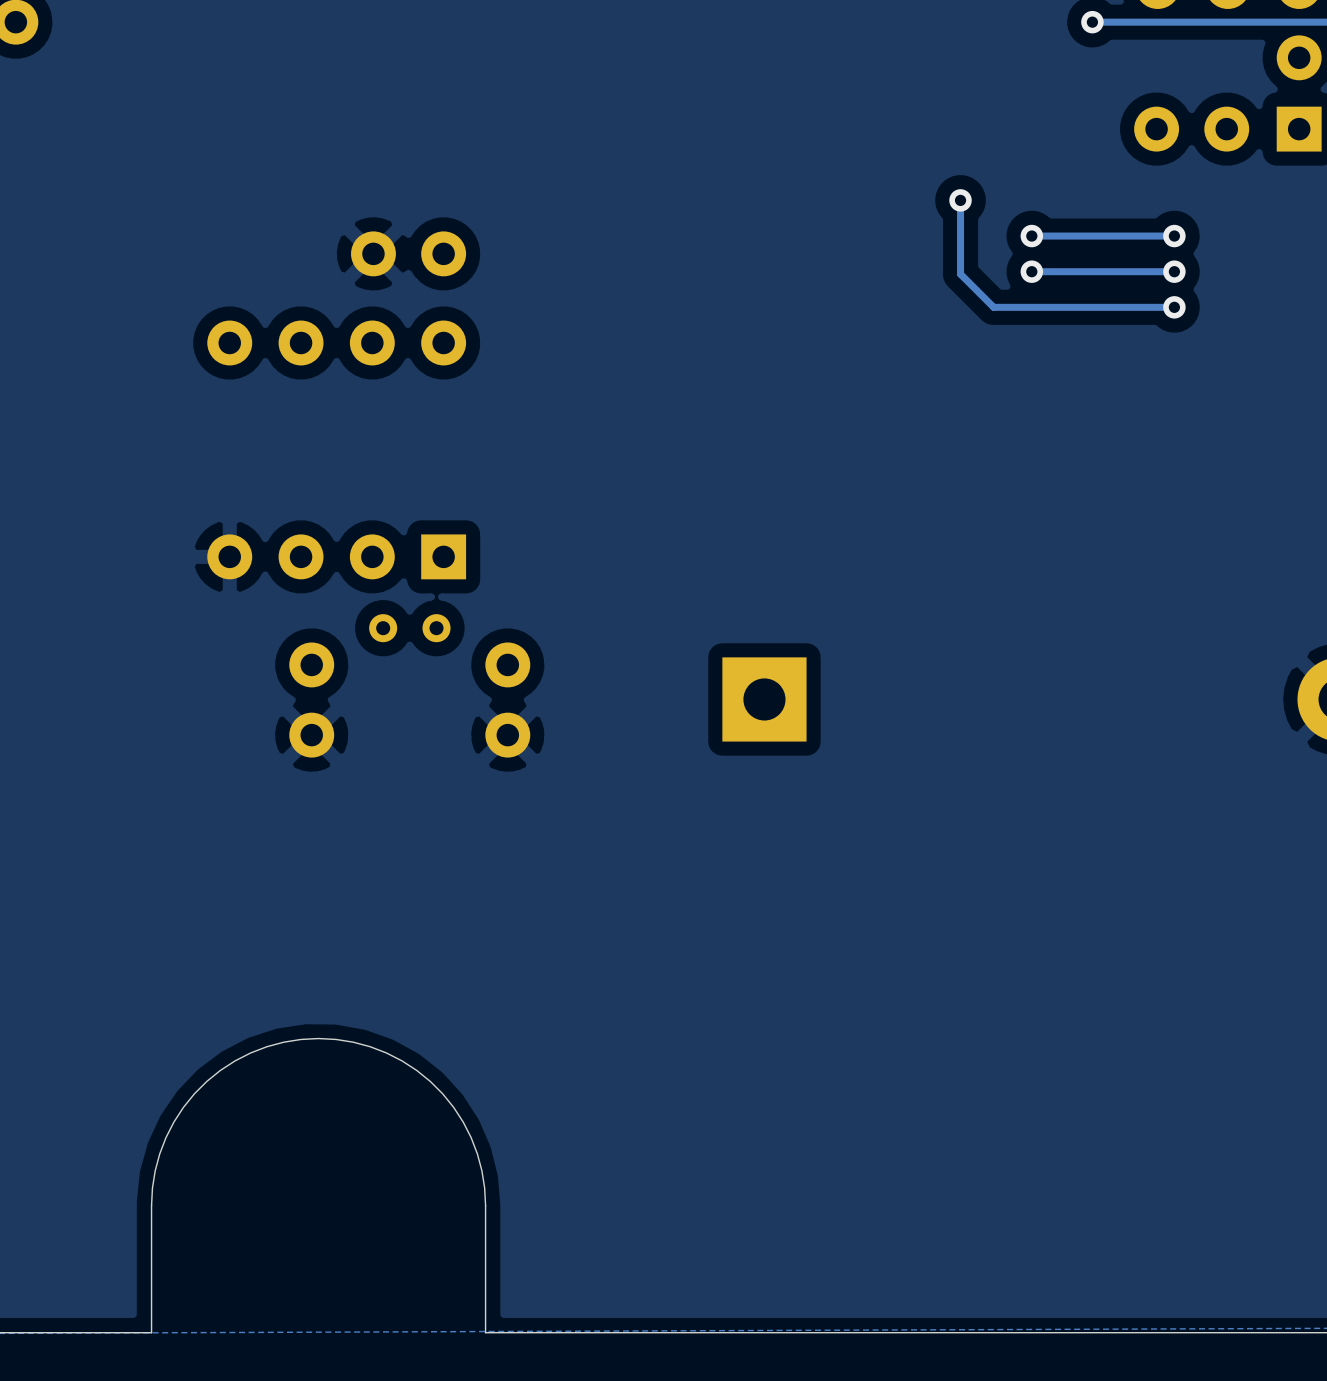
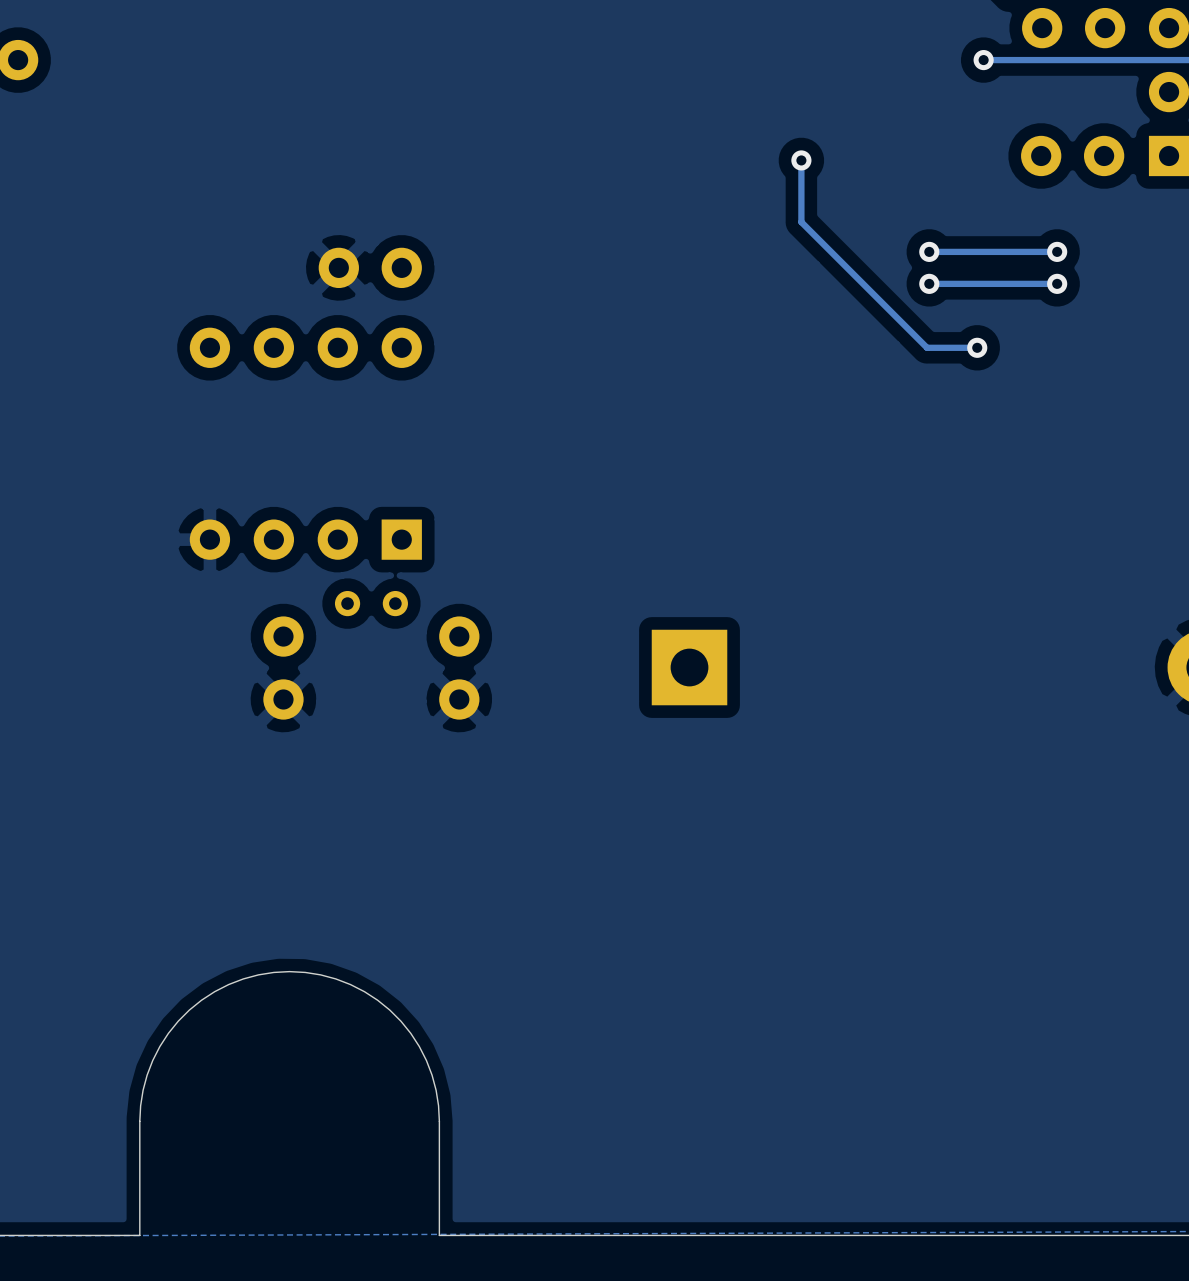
via: none -> (801, 160)
track: (960, 200) (960, 274) -> (801, 160) (801, 222) (865, 286)
via: (960, 200) -> none
track: (1174, 307) (993, 307) -> (977, 347) (927, 347) (895, 315)
via: (1174, 307) -> none
via: none -> (977, 347)

